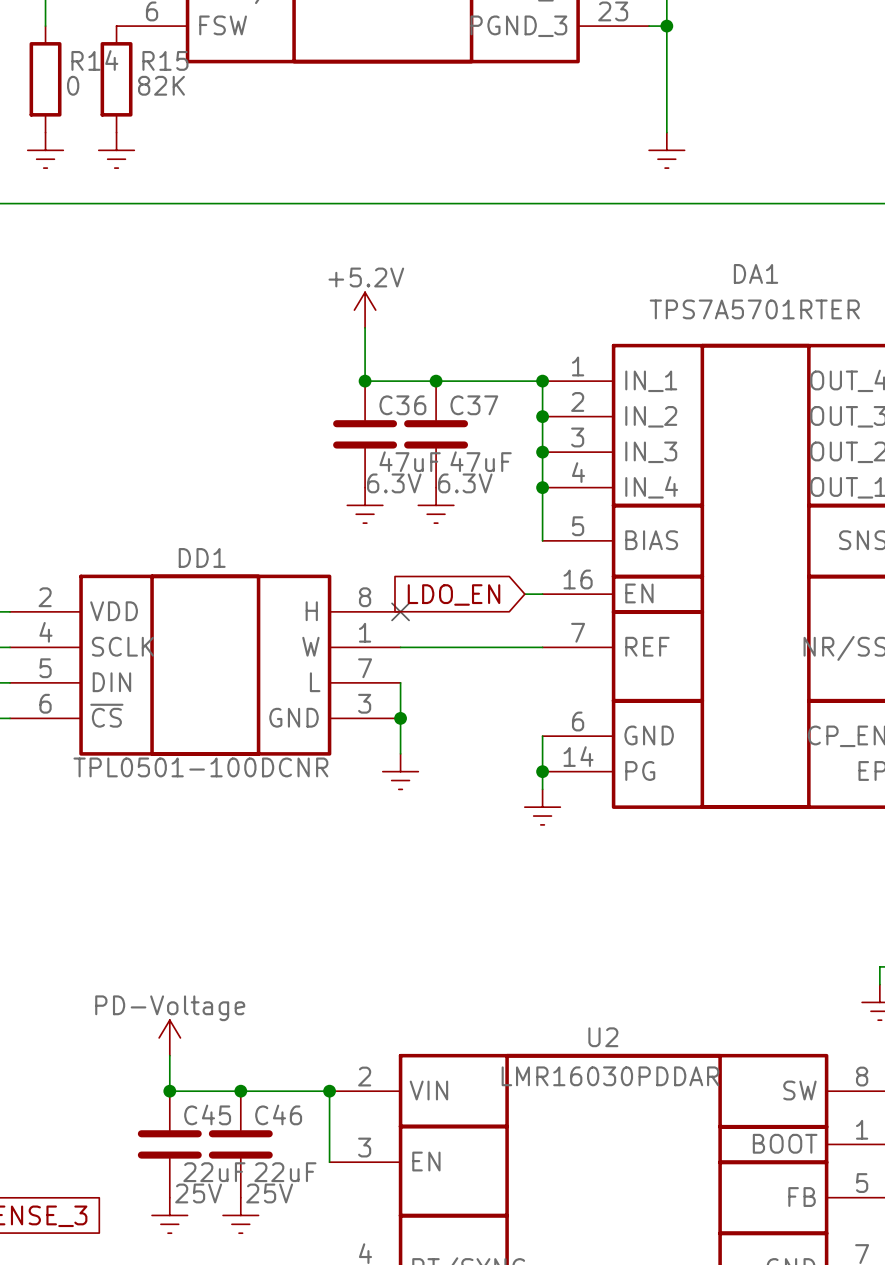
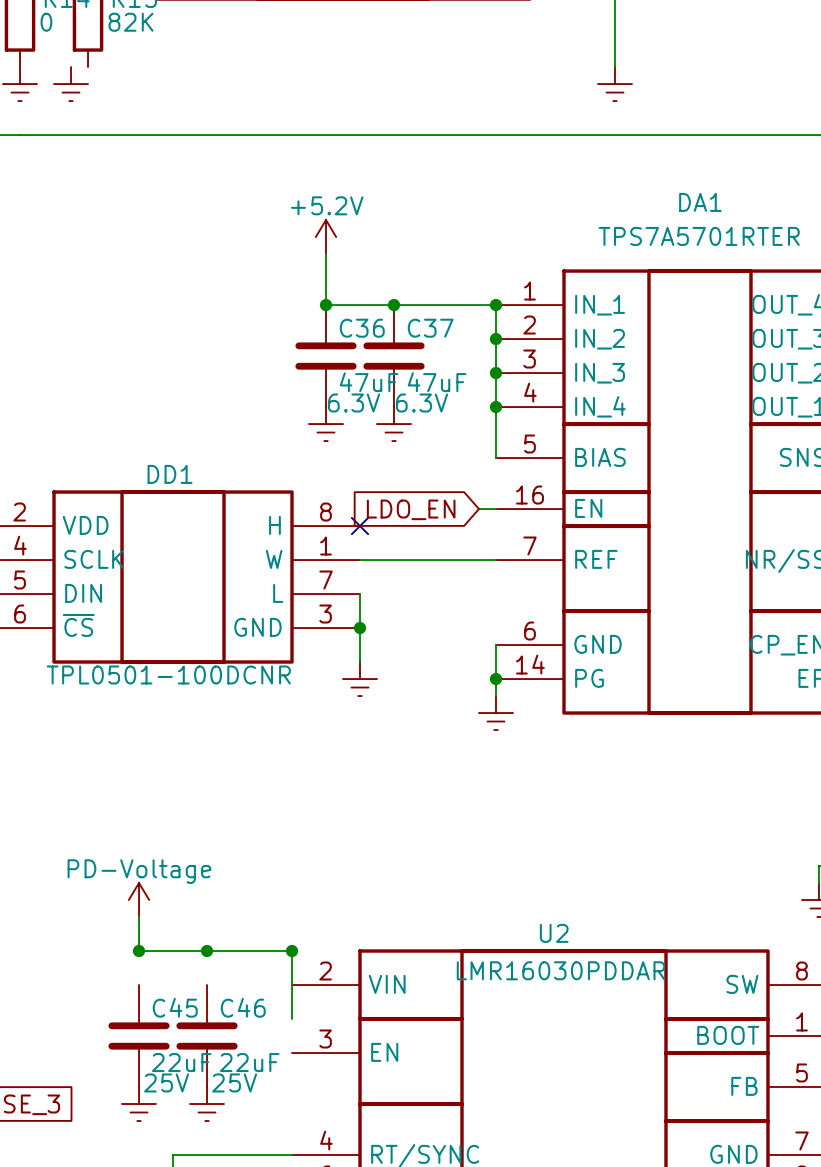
power symbol position: (116, 150) -> (71, 84)
power symbol position: PD-Voltage (169, 1037) -> PD-Voltage (139, 900)
wire: (169, 1055) (169, 1091) (329, 1091) -> (139, 917) (139, 951) (292, 951) (292, 985)
junction position: (169, 1091) -> (139, 951)
junction position: (240, 1091) -> (207, 951)
junction position: (329, 1091) -> (292, 951)
wire: (329, 1126) (329, 1162) -> none

